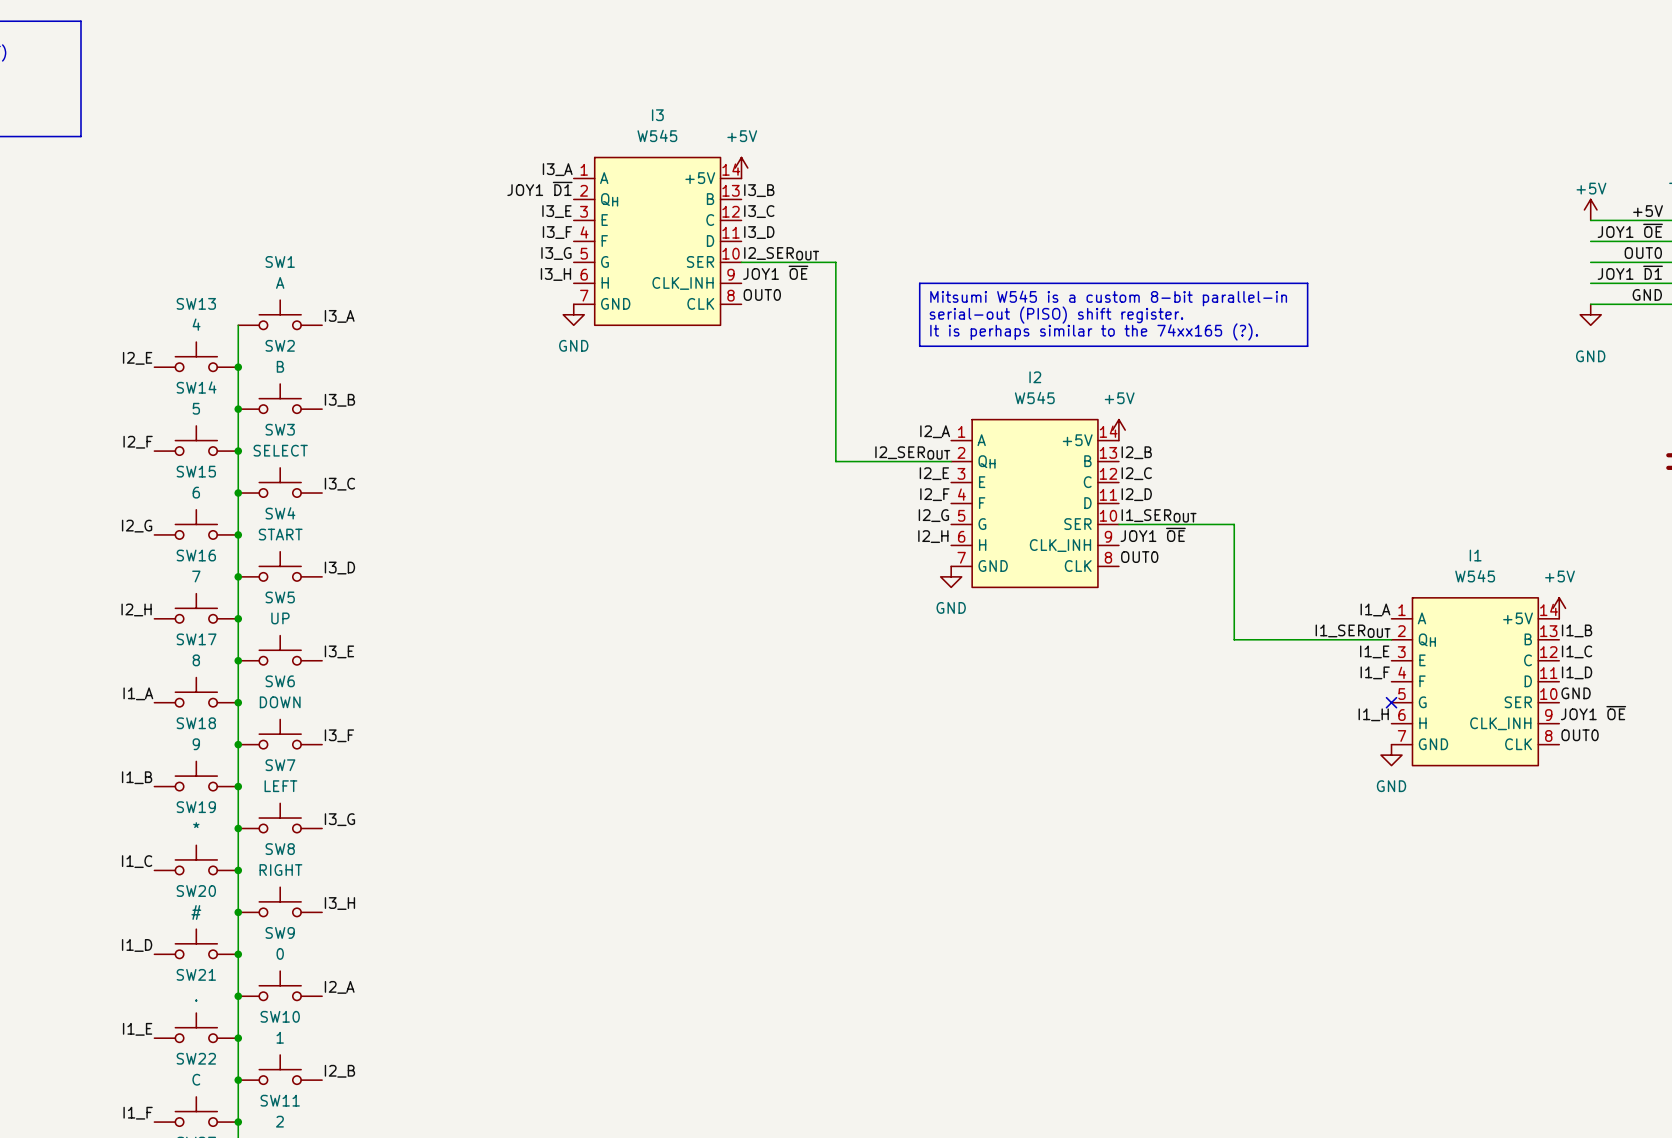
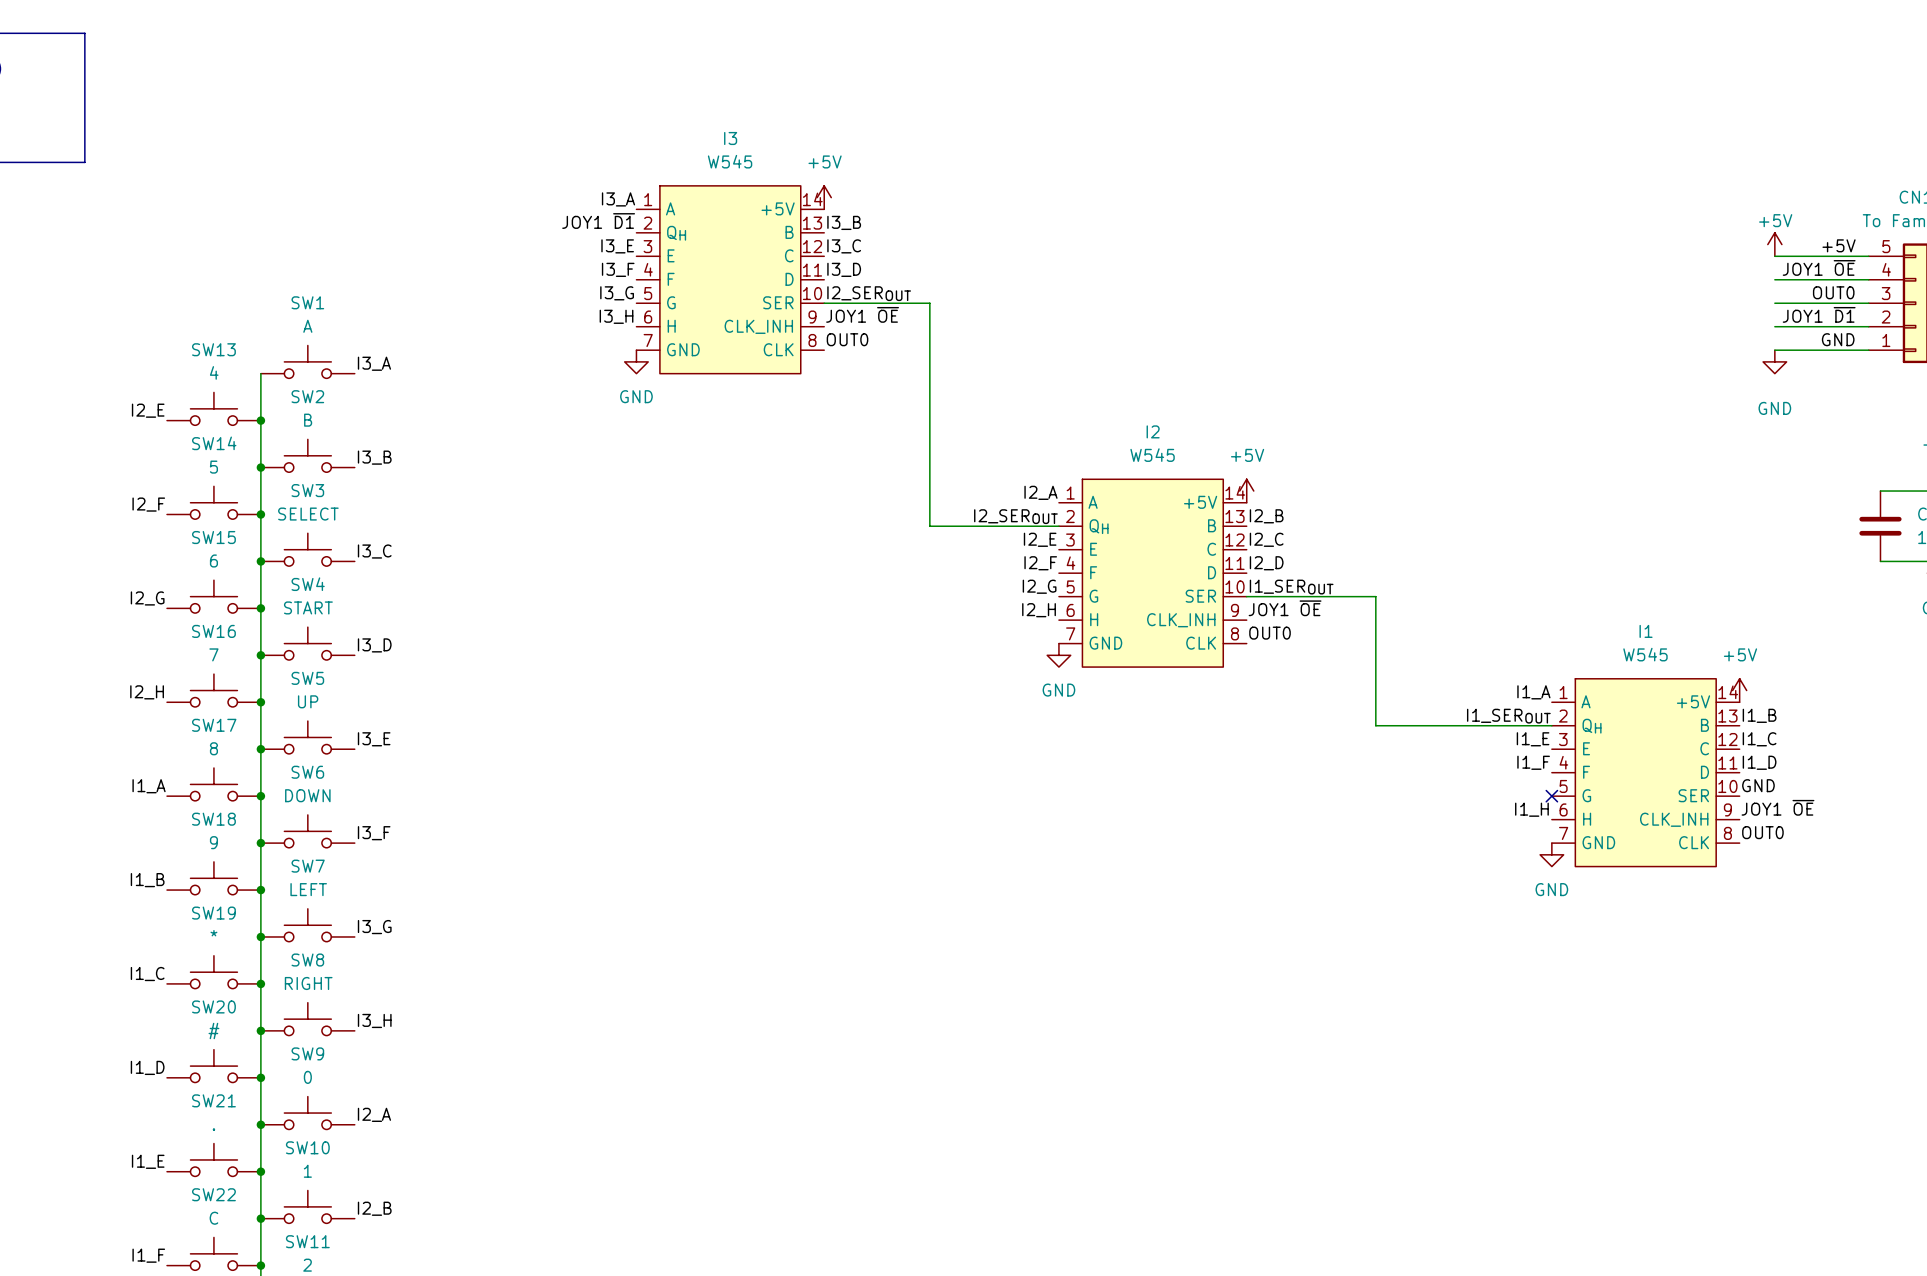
line: (919, 283) (1307, 283) (1307, 346) (919, 346) (919, 283) -> none
text: Mitsumi W545 is a custom 8-bit parallel-in (1108, 298) -> none
text: serial-out (PISO) shift register. (1056, 315) -> none
text: It is perhaps similar to the 74xx165 (?). (1094, 331) -> none

